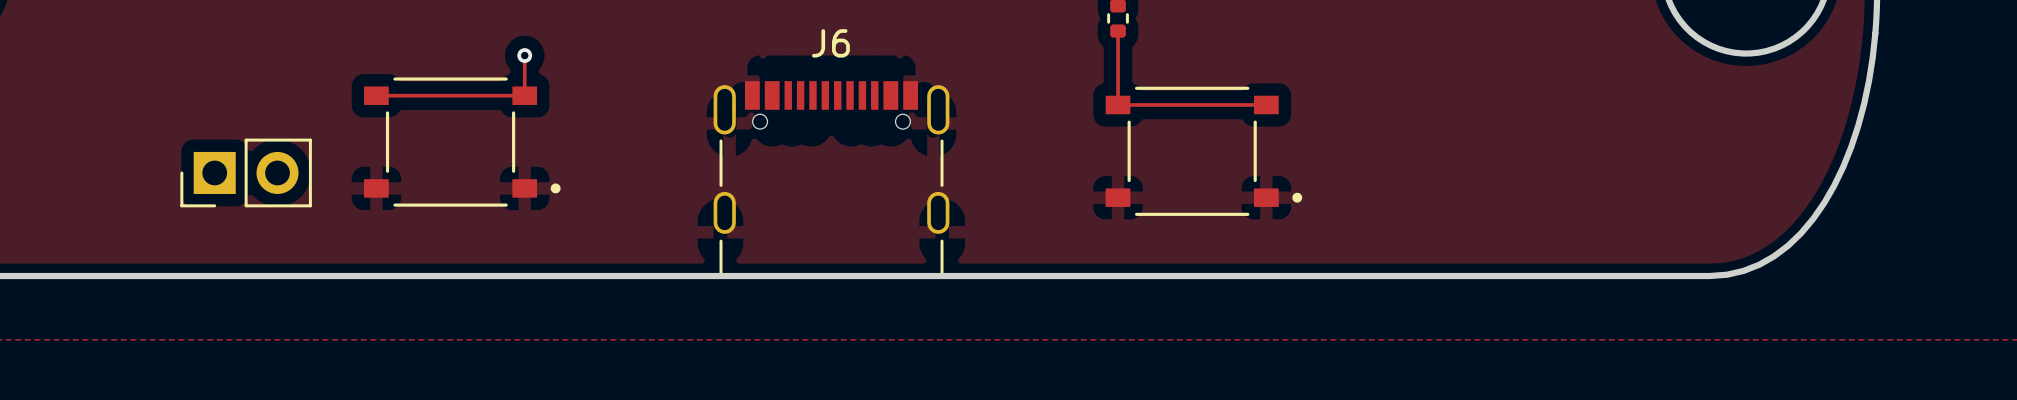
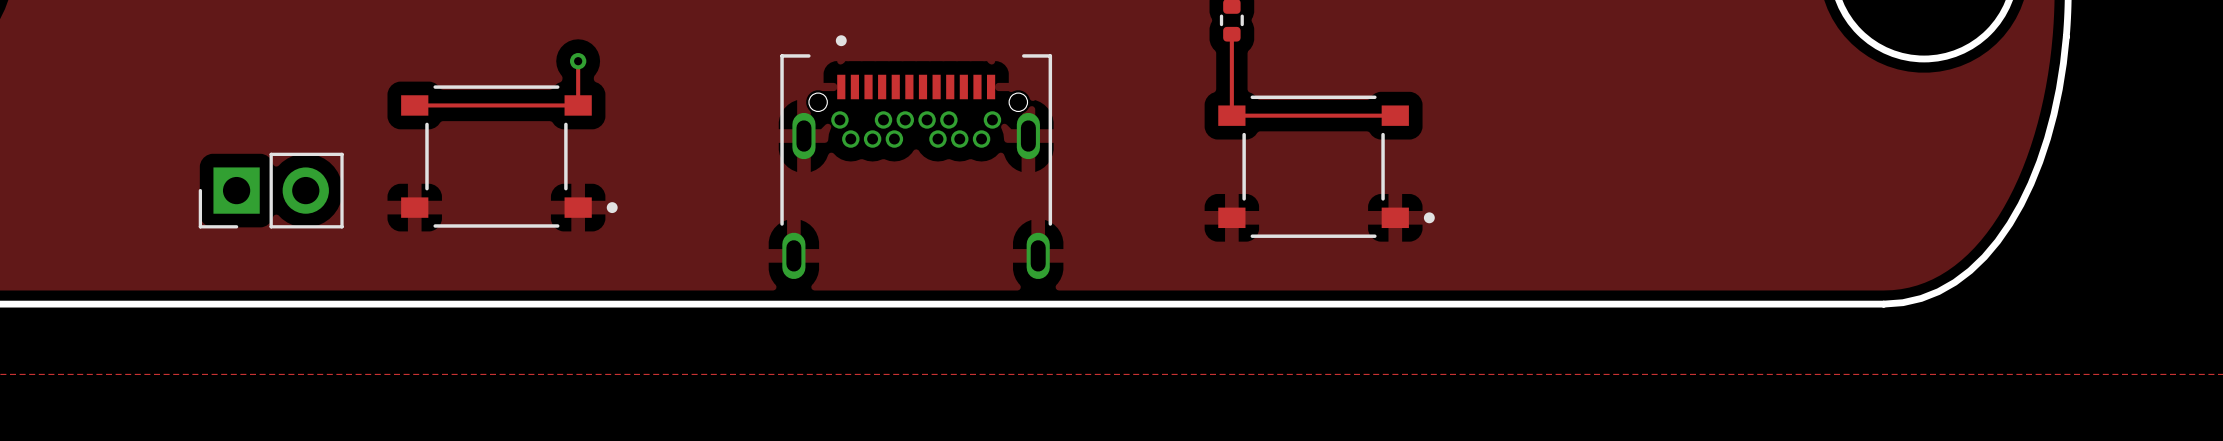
part: none -> (916, 157)
J6: (831, 179) -> none

